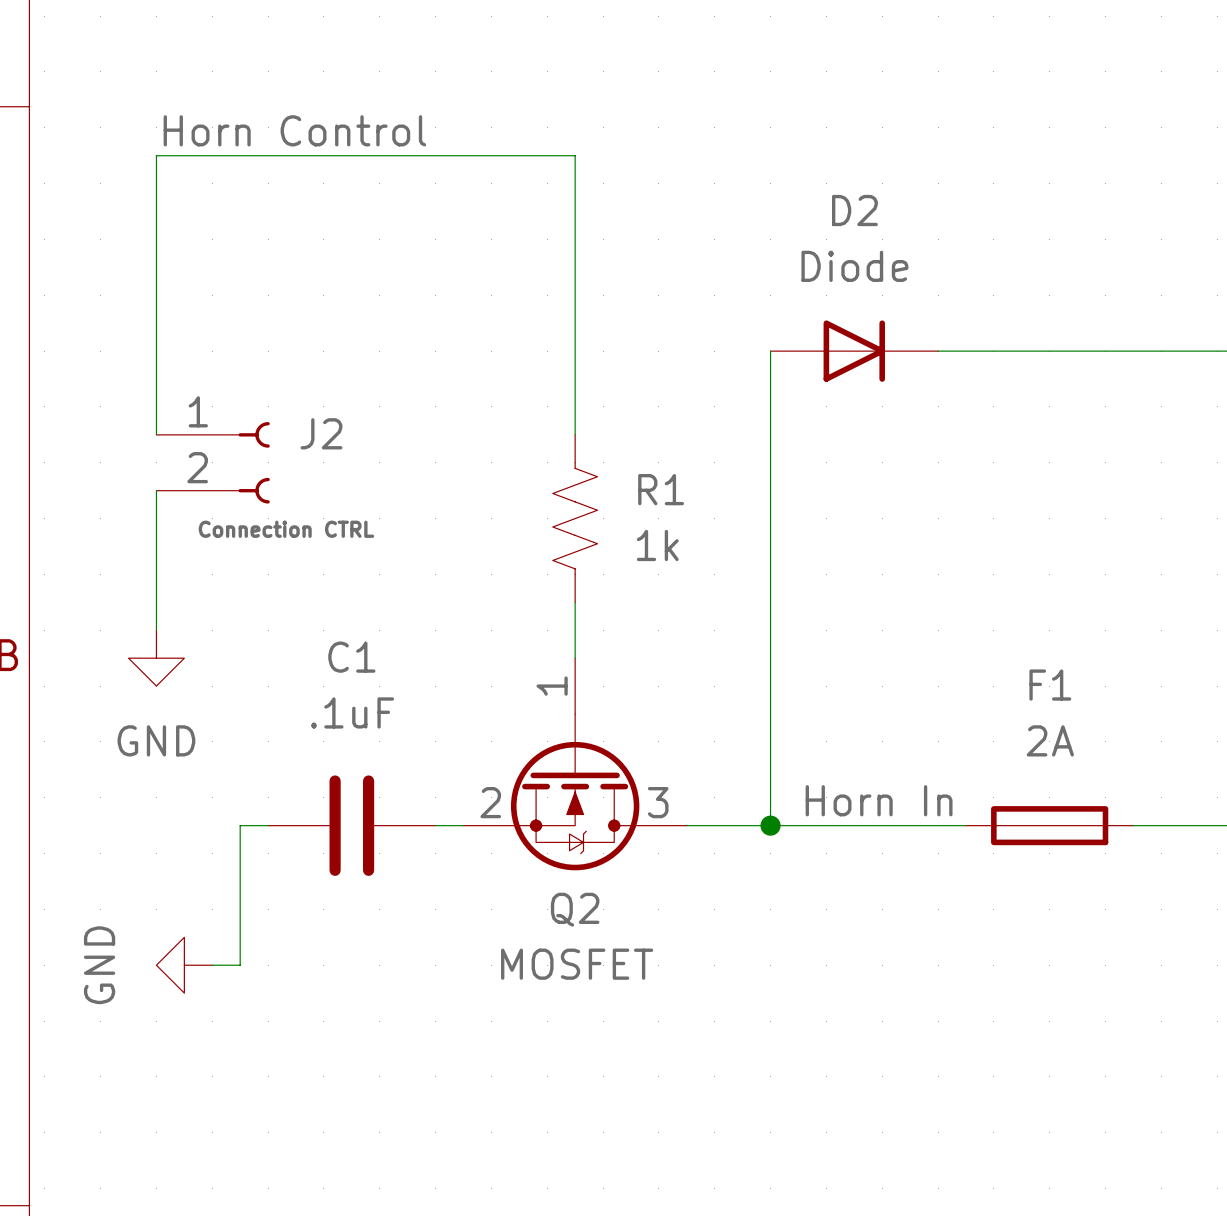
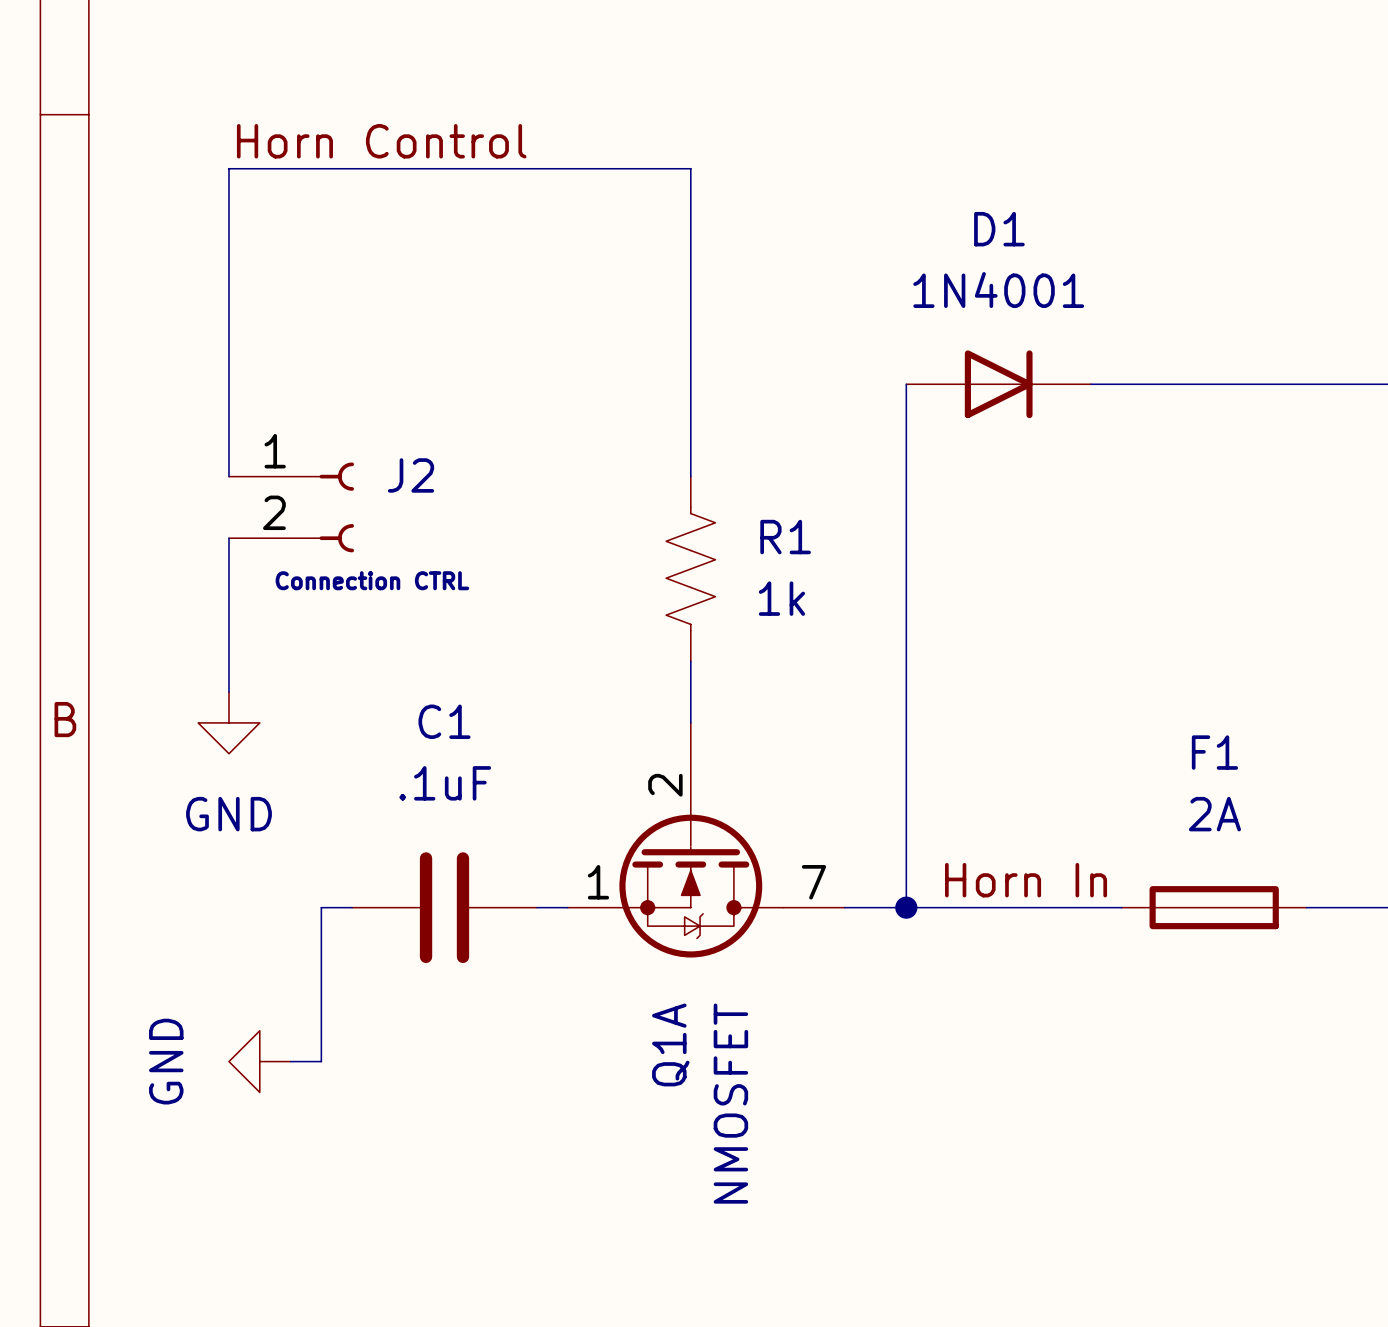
D2 name: D2 (854, 210) -> D1 (999, 229)
D2 value: Diode (854, 266) -> 1N4001 (998, 290)
Q2: MOSFET (575, 764) -> none
Q1A: none -> NMOSFET (706, 840)

